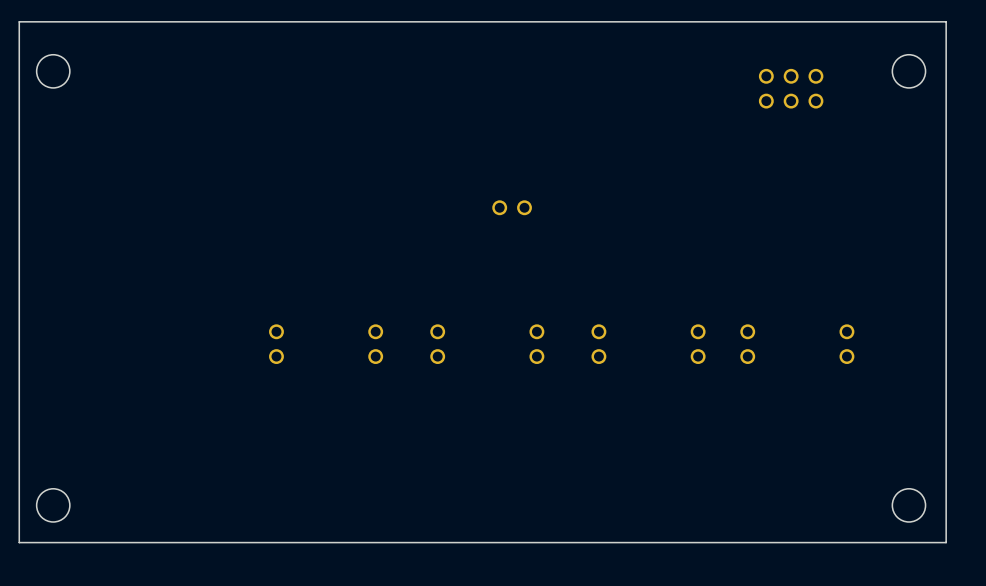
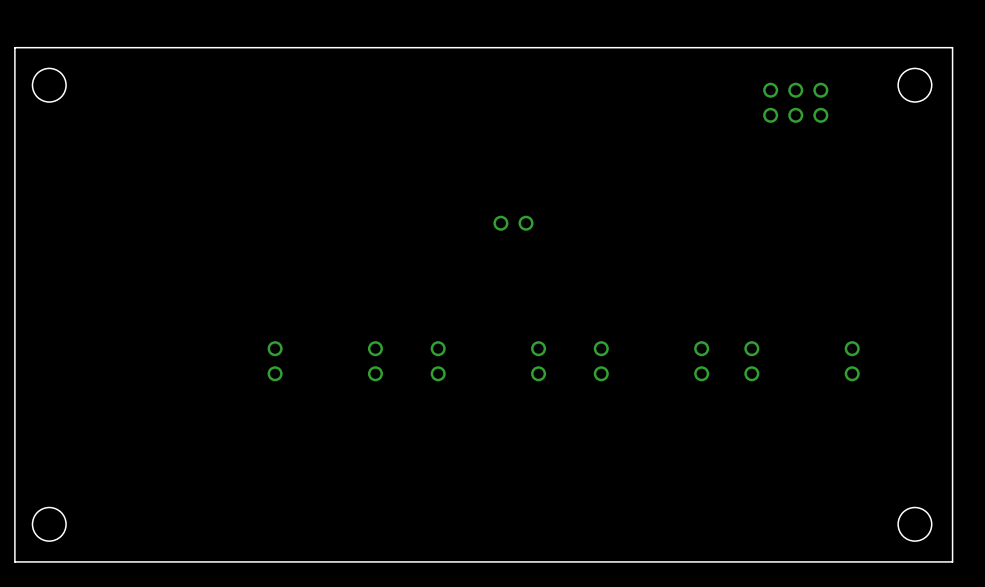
board edge: (946, 34) (946, 21) (19, 21) (19, 34) -> (952, 47) (14, 47)

